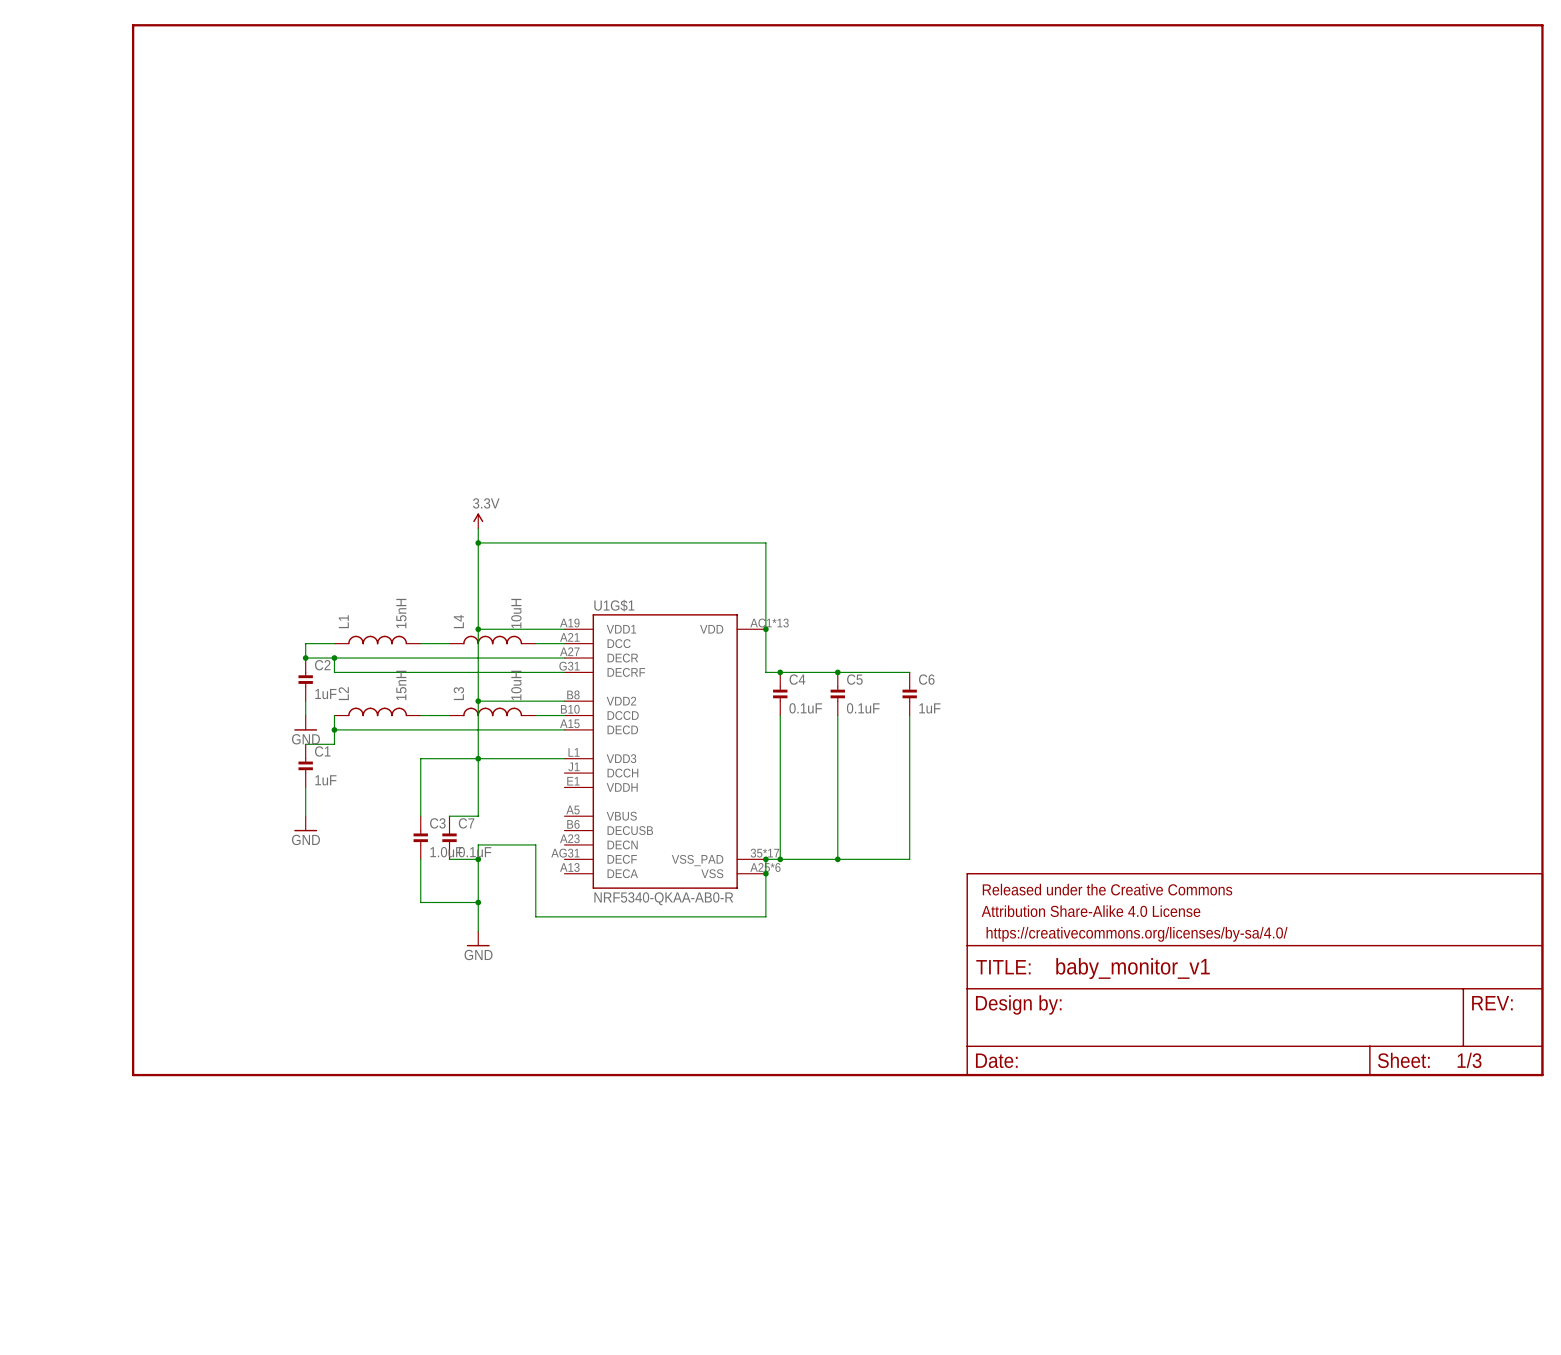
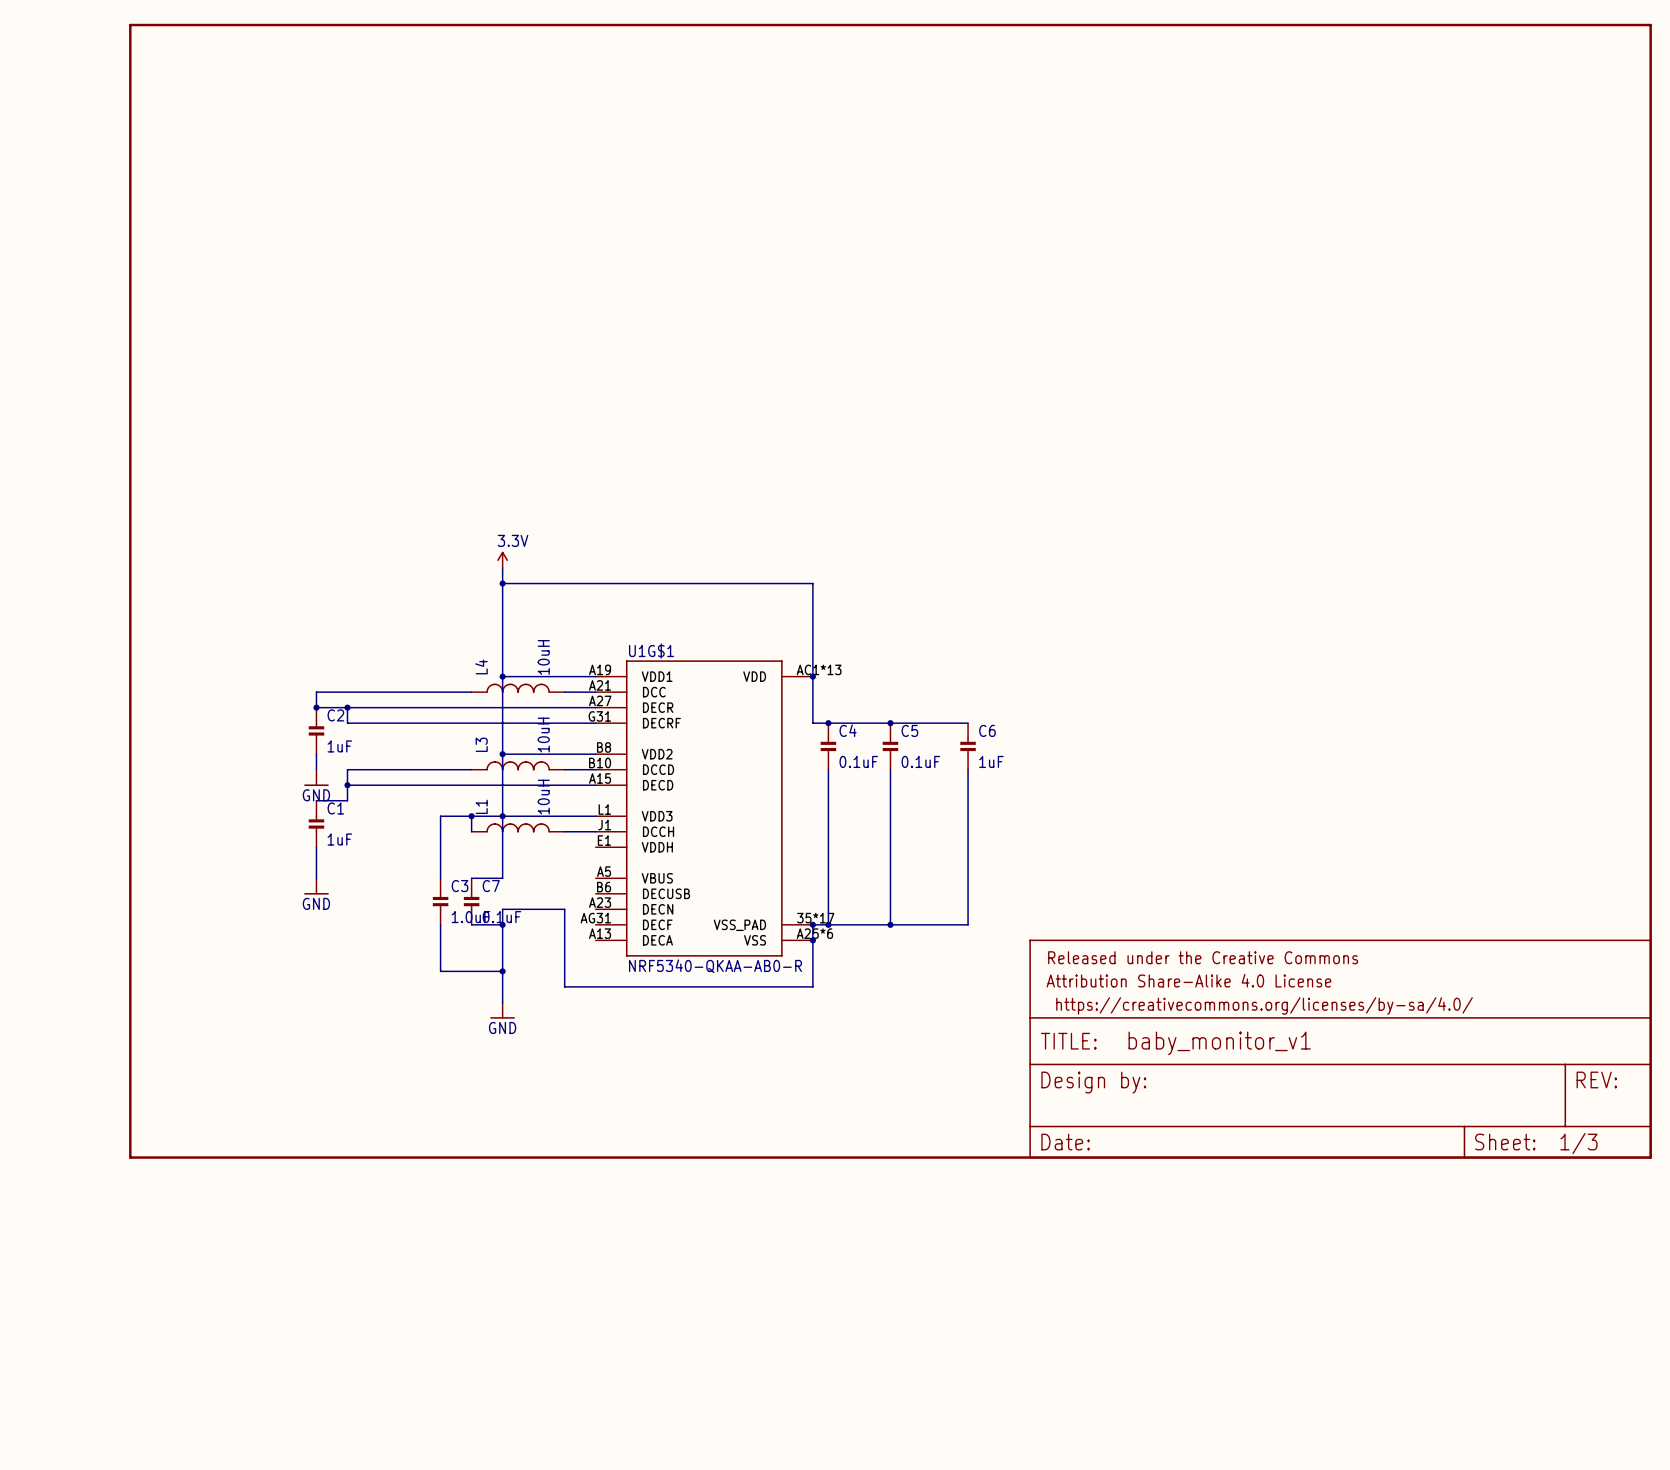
L1 value: 15nH (401, 613) -> 10uH (543, 797)
L1 position: (377, 640) -> (518, 827)
wire: none -> (347, 692) (440, 692)
L2: 15nH (377, 711) -> none
wire: none -> (347, 769) (440, 769)
wire: none -> (471, 816) (471, 831)
junction: none -> (471, 816)
wire: none -> (564, 831) (595, 831)

